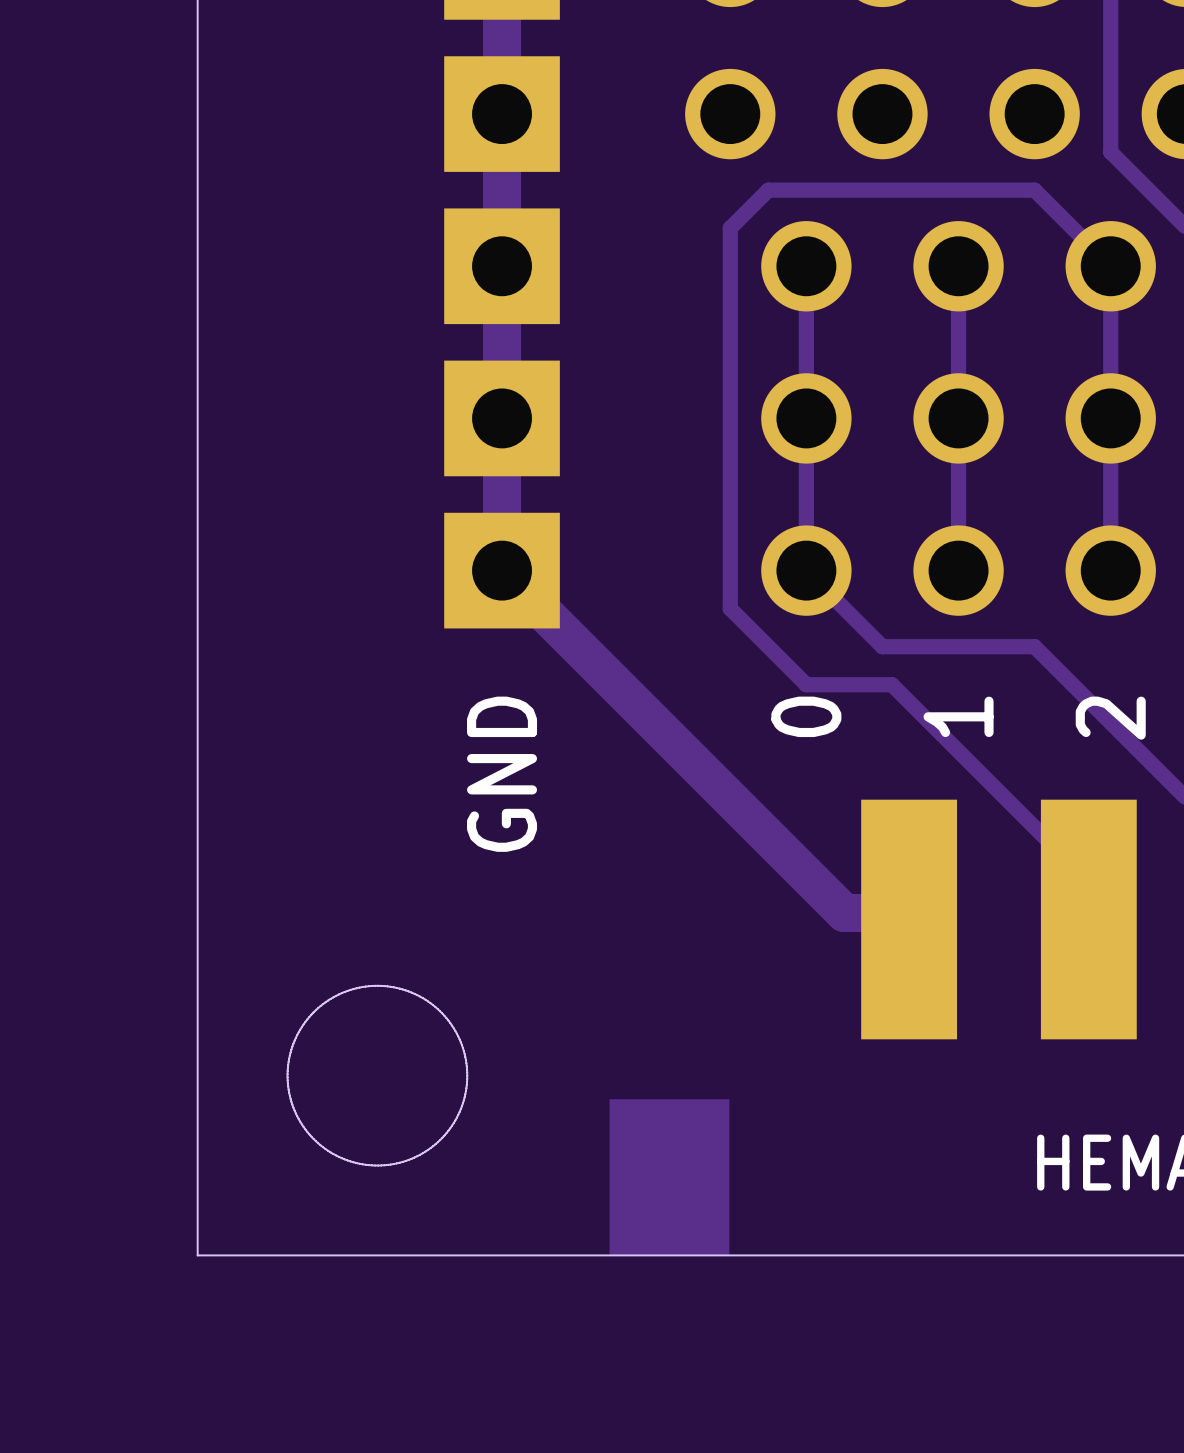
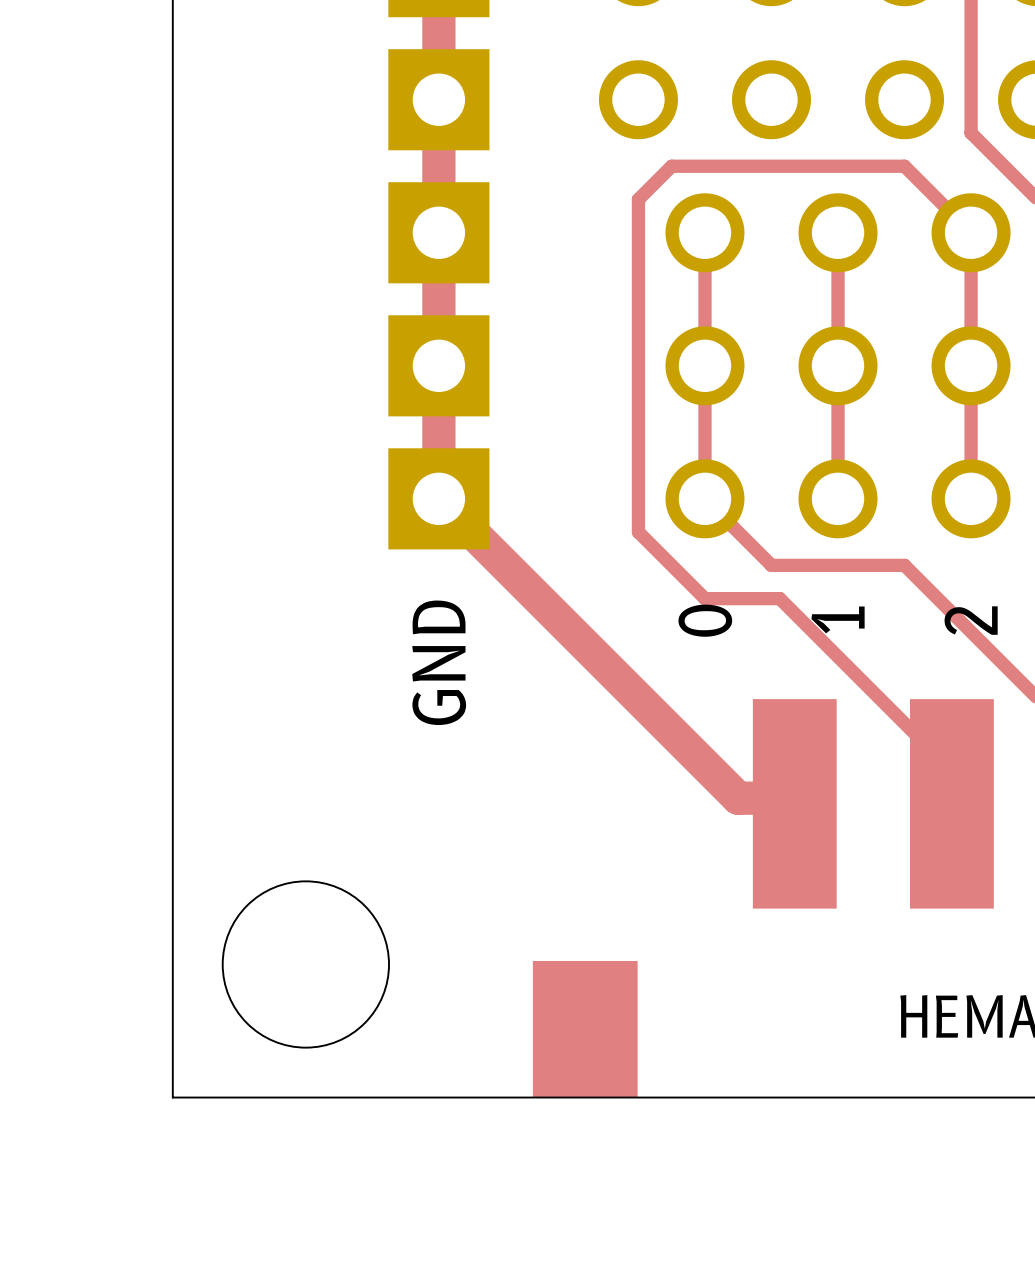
board edge: (371, 985) (387, 986) (405, 990) (422, 998) (437, 1009) (450, 1023) (458, 1036) (463, 1051) (467, 1069) (466, 1088) (462, 1103) (455, 1120) (444, 1135) (433, 1146) (417, 1156) (399, 1162) (381, 1165) (362, 1164) (344, 1159) (328, 1150) (315, 1141) (305, 1129) (295, 1113) (289, 1095) (287, 1080) (288, 1061) (292, 1046) (298, 1032) (309, 1016) (322, 1004) (338, 994) (356, 988) (371, 985) -> none
round board edge: none -> [222, 880, 390, 1049]

